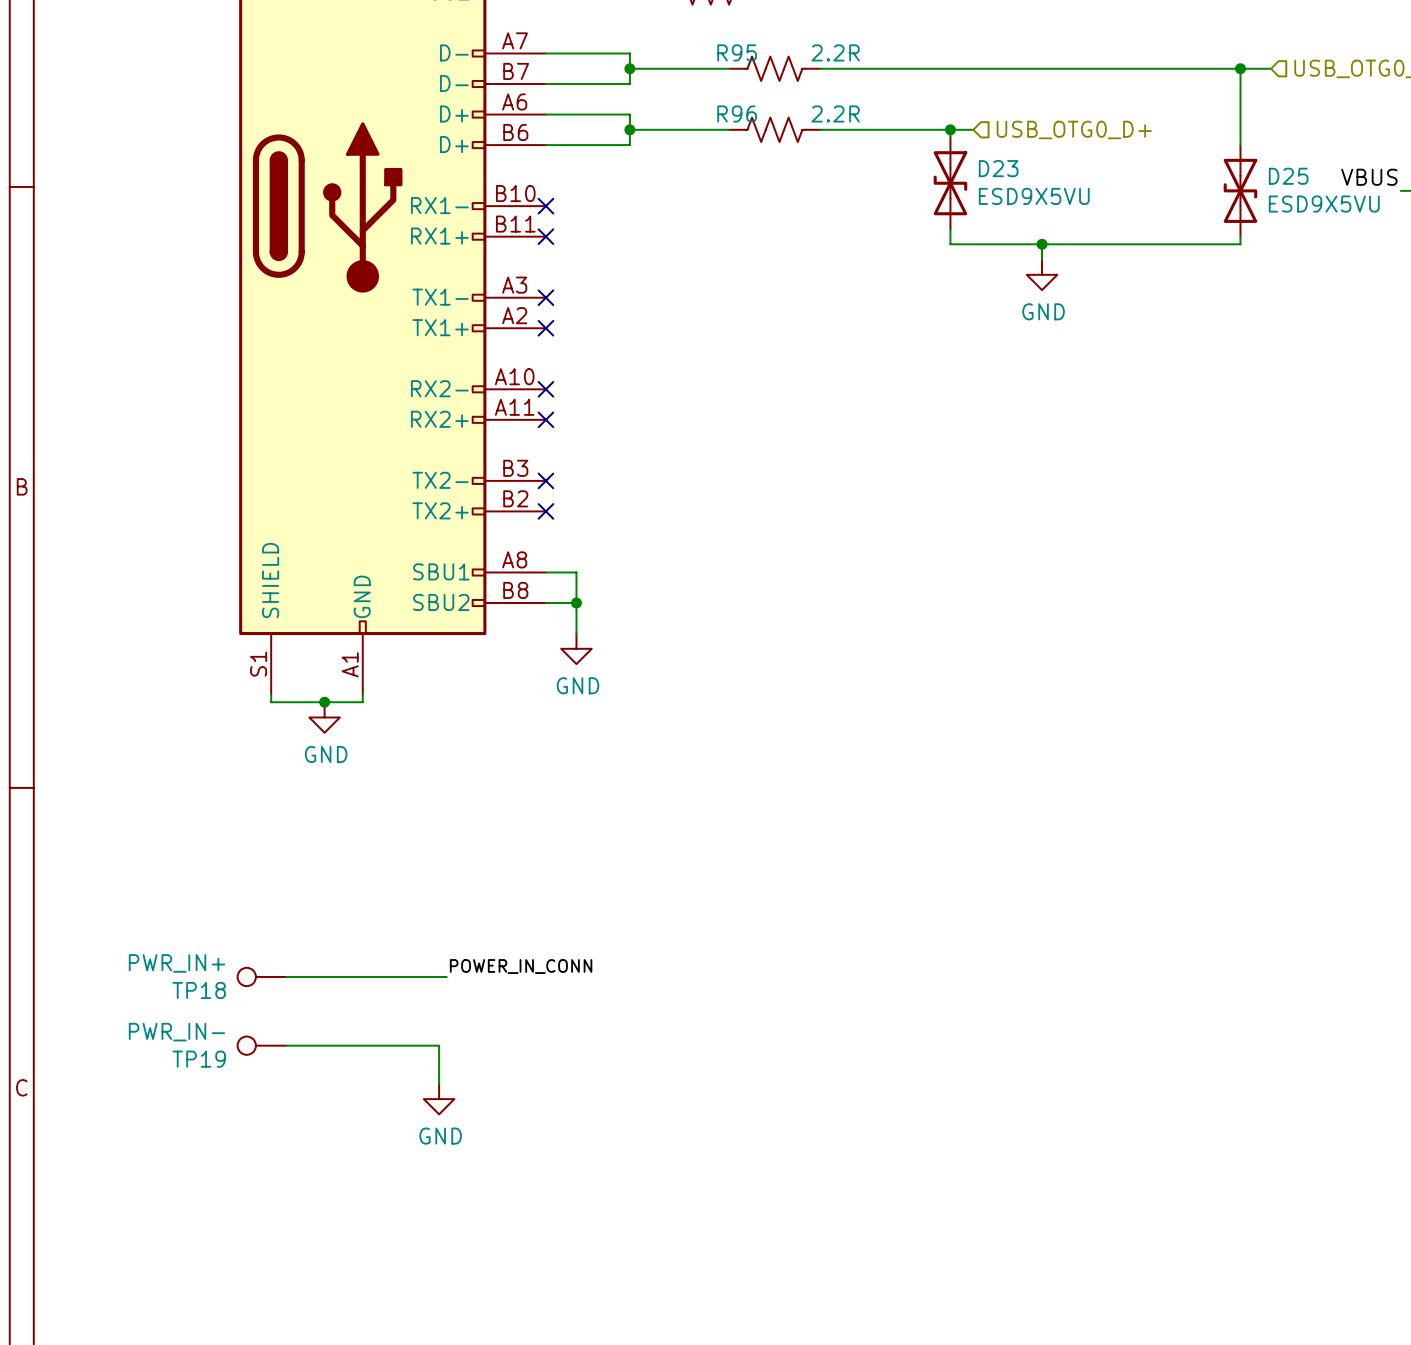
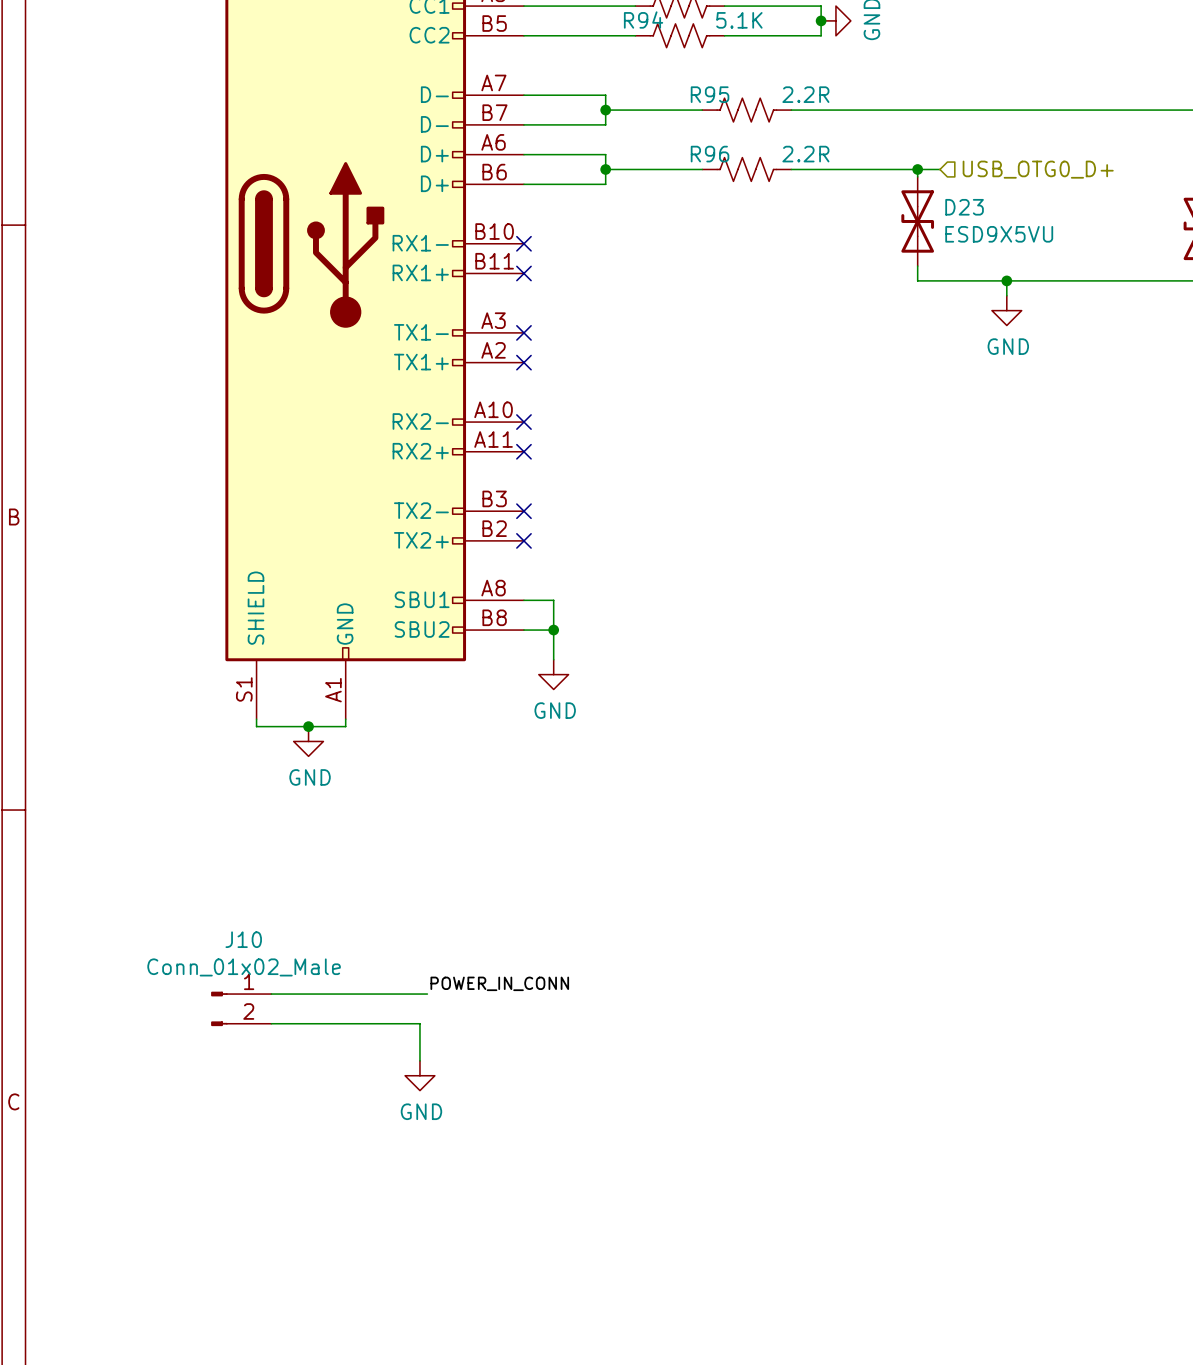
TP18: PWR_IN+ (262, 976) -> none
J10: none -> Conn_01x02_Male (241, 1008)
TP19: PWR_IN- (262, 1045) -> none
wire: (286, 1045) (439, 1045) (439, 1083) -> (271, 1023) (419, 1023) (419, 1060)
power symbol position: GND (439, 1099) -> GND (419, 1075)

